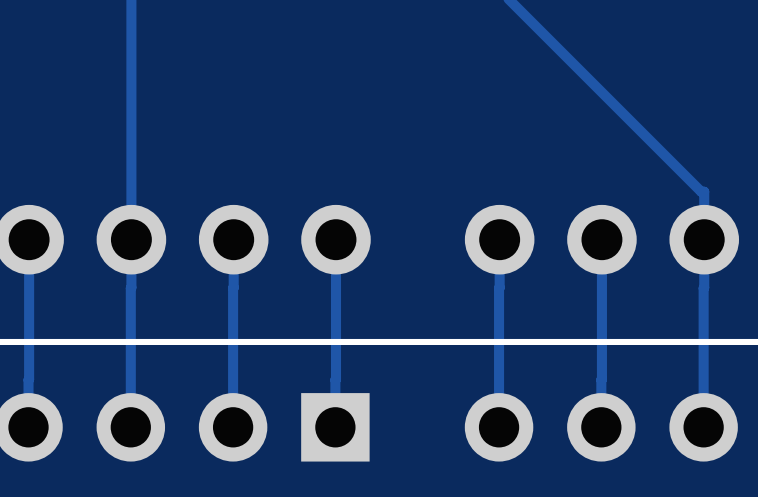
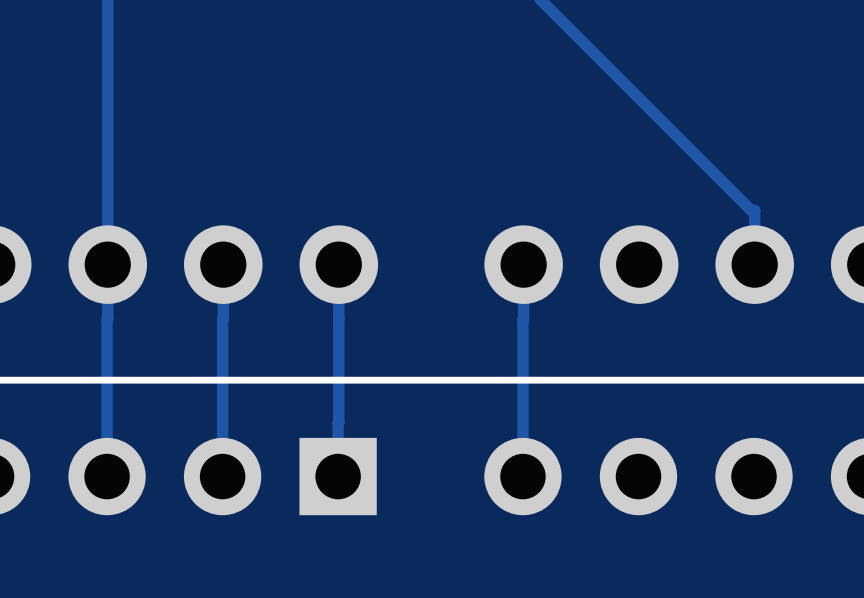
track: (601, 239) (601, 427) -> none
track: (704, 239) (703, 427) -> none

